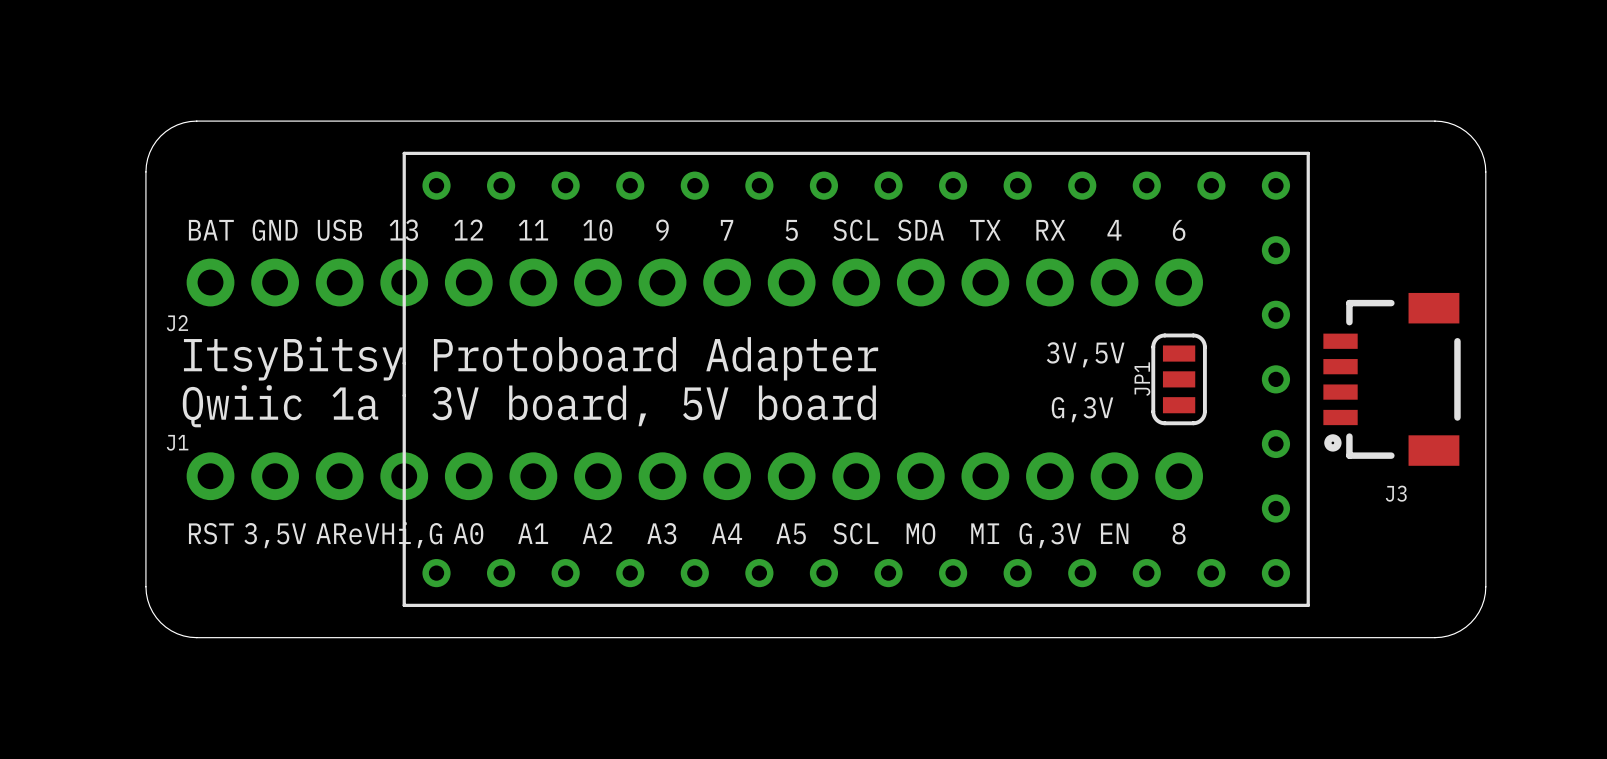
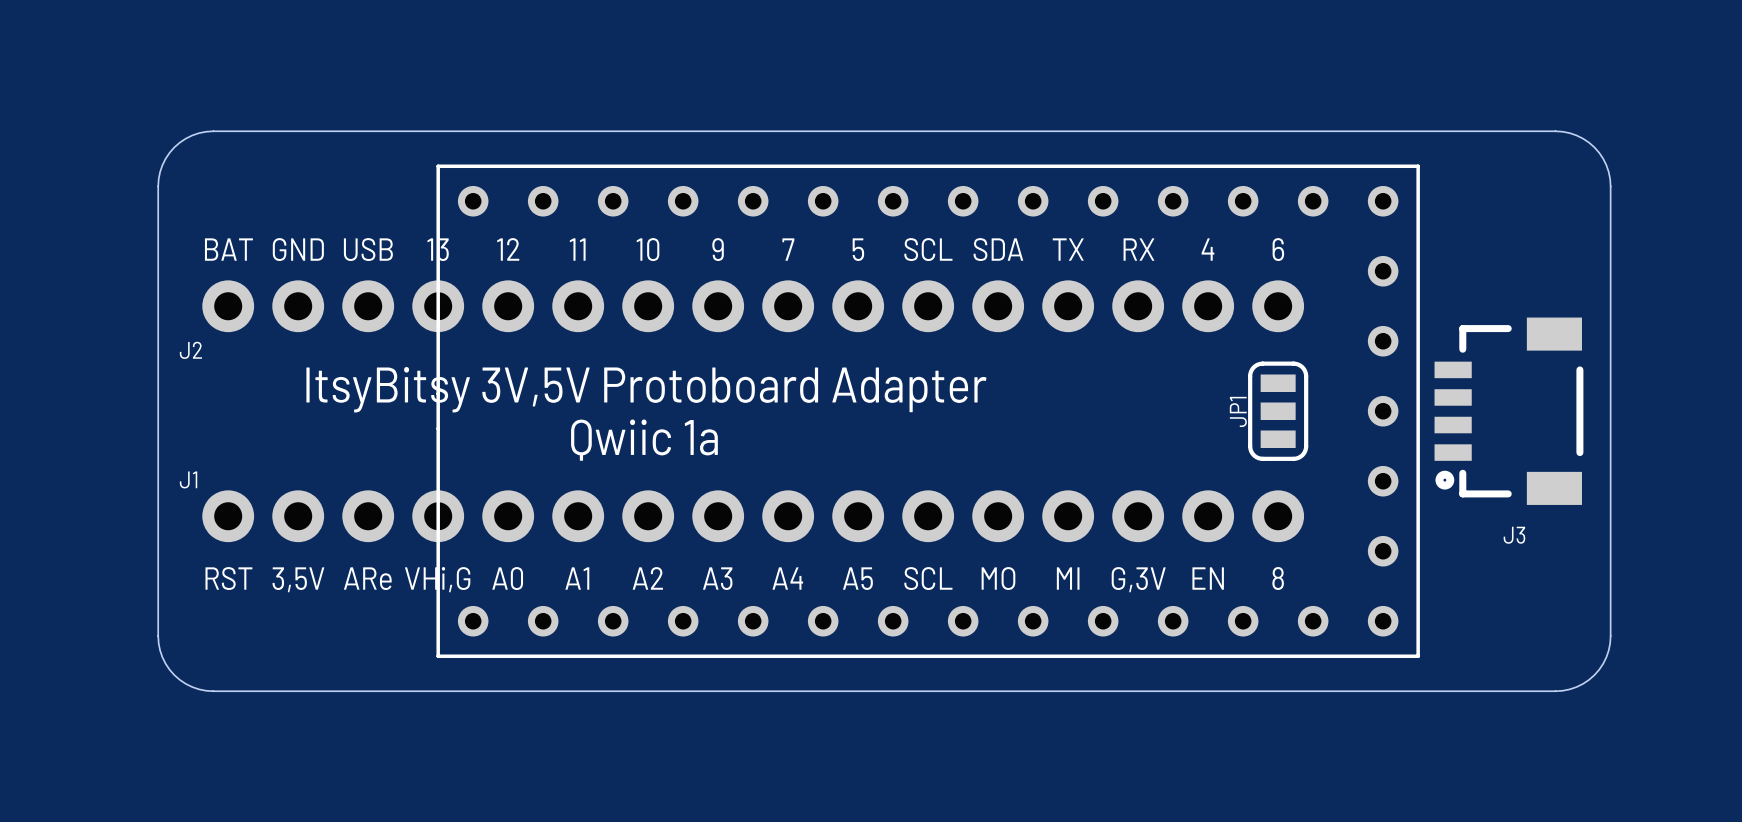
text: 3V,5V (1085, 354) -> none
text: ItsyBitsy Protoboard Adapter (531, 358) -> ItsyBitsy 3V,5V Protoboard Adapter (646, 389)
text: Qwiic 1a 3V board, 5V board (529, 406) -> none
text: none -> Qwiic 1a (644, 440)
text: G,3V (1082, 409) -> none

